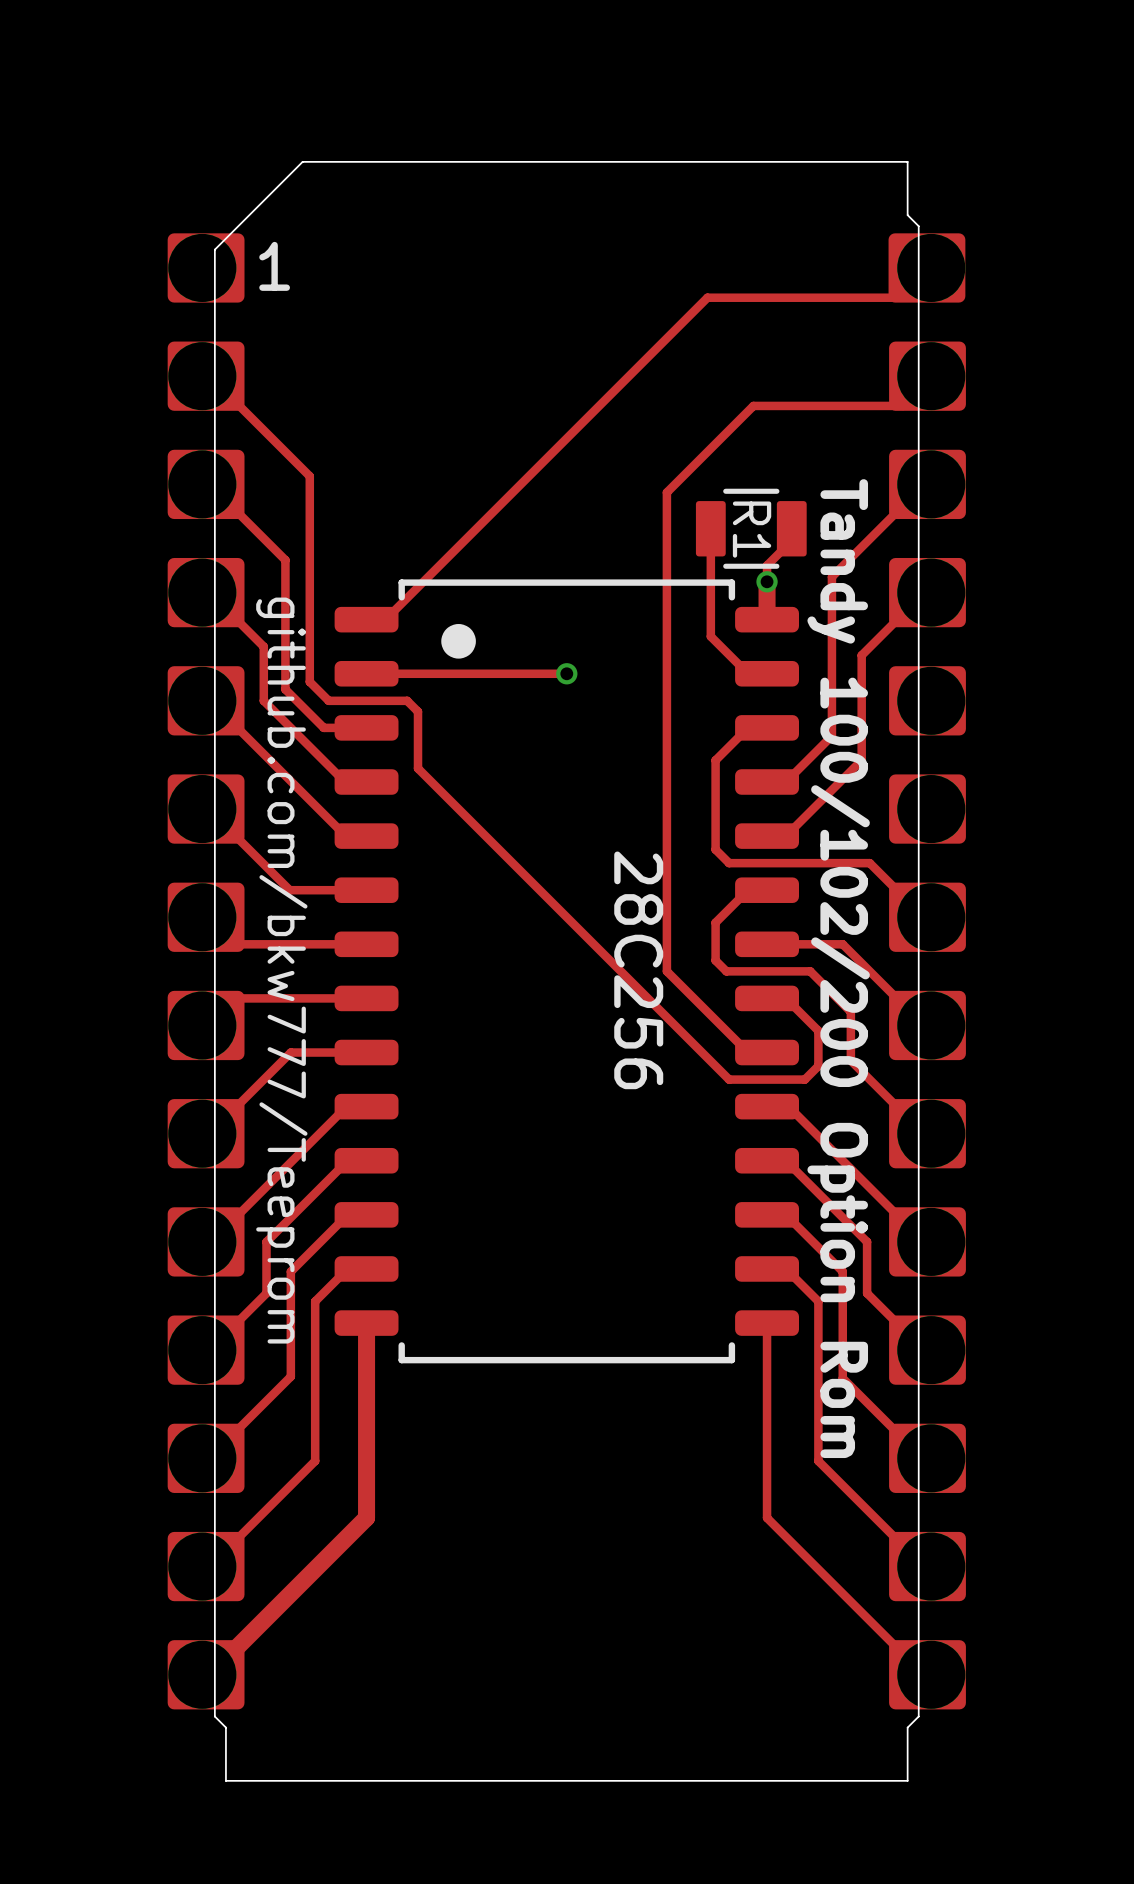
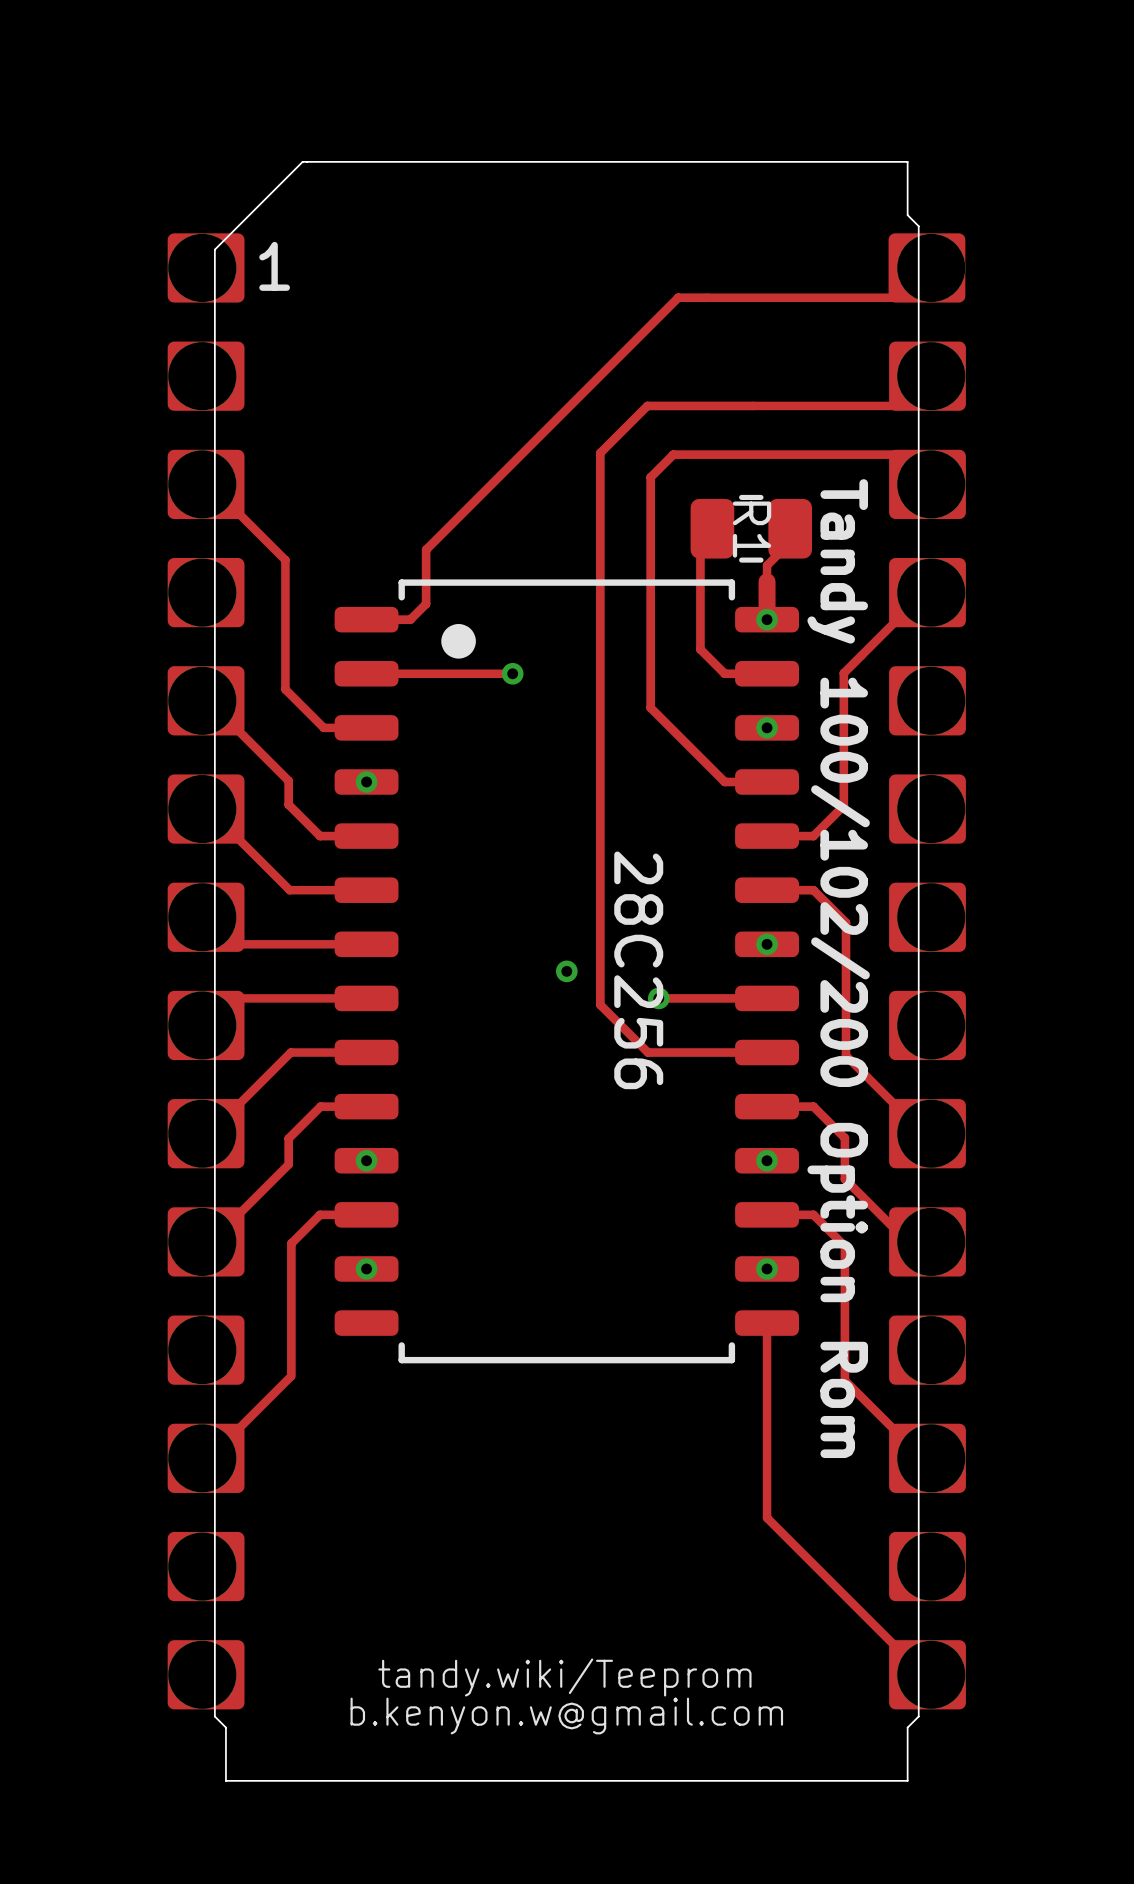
track: (707, 297) (385, 619) -> (707, 297) (678, 297) (426, 549) (426, 603) (410, 619) (385, 619)
track: (202, 376) (209, 376) (309, 476) (309, 681) (328, 700) (407, 700) (418, 711) (418, 768) (729, 1079) (804, 1079) (818, 1066) (818, 1030) (785, 998) (767, 998) -> (658, 998) (767, 998)
track: (753, 405) (666, 492) (666, 971) (748, 1052) -> (753, 405) (647, 405) (600, 453) (600, 1004) (647, 1052) (748, 1052)
track: (924, 484) (831, 576) (831, 735) (785, 781) (767, 781) -> (924, 484) (894, 454) (673, 454) (650, 477) (650, 707) (724, 781) (767, 781)
R1 footprint: [695, 488, 807, 569] -> [690, 494, 813, 563]
track: (710, 541) (710, 636) (748, 673) -> (710, 541) (700, 552) (700, 649) (724, 673) (748, 673)
via: (767, 581) -> none
track: (202, 592) (209, 592) (263, 646) (263, 700) (344, 781) (366, 781) -> none
via: none -> (767, 619)
track: (861, 655) (861, 760) (785, 836) -> (861, 655) (843, 673) (843, 805) (813, 836) (785, 836)
track: (512, 673) (566, 673) -> none
via: none -> (512, 673)
via: (566, 673) -> none
track: (208, 700) (345, 836) -> (208, 700) (288, 780) (288, 804) (320, 836) (345, 836)
track: (767, 727) (748, 727) (715, 760) (715, 849) (729, 863) (869, 863) (923, 917) (931, 917) -> none
via: none -> (767, 727)
via: none -> (366, 781)
track: (767, 890) (748, 890) (715, 922) (715, 960) (726, 971) (810, 971) (850, 1011) (850, 1060) -> (767, 890) (813, 890) (845, 922) (845, 1055) (850, 1060)
track: (767, 944) (842, 944) (923, 1025) (931, 1025) -> none
via: none -> (767, 944)
text: github.com/bkw777/Teeprom (281, 970) -> none
via: none -> (566, 971)
via: none -> (658, 998)
track: (346, 1106) (288, 1164) -> (346, 1106) (320, 1106) (288, 1138) (288, 1164)
track: (788, 1106) (923, 1241) -> (788, 1106) (813, 1106) (844, 1138) (844, 1179) (907, 1241) (923, 1241)
track: (366, 1160) (347, 1160) (266, 1241) (266, 1293) (209, 1350) (202, 1350) -> none
via: none -> (366, 1160)
via: none -> (766, 1160)
track: (767, 1160) (785, 1160) (867, 1241) (867, 1293) (923, 1350) (931, 1350) -> none
track: (347, 1214) (290, 1271) (290, 1376) -> (347, 1214) (320, 1214) (291, 1243) (291, 1376)
track: (785, 1214) (842, 1271) (842, 1378) (844, 1380) -> (785, 1214) (813, 1214) (844, 1246) (844, 1380)
track: (366, 1268) (347, 1268) (315, 1301) (315, 1461) (209, 1566) (202, 1566) -> none
via: none -> (366, 1268)
via: none -> (766, 1268)
track: (767, 1268) (785, 1268) (818, 1301) (818, 1461) (923, 1566) (931, 1566) -> none
track: (366, 1323) (366, 1517) (209, 1674) (202, 1674) -> none
text: none -> tandy.wiki/Teeprom (564, 1677)
text: none -> b.kenyon.w@gmail.com (566, 1716)

